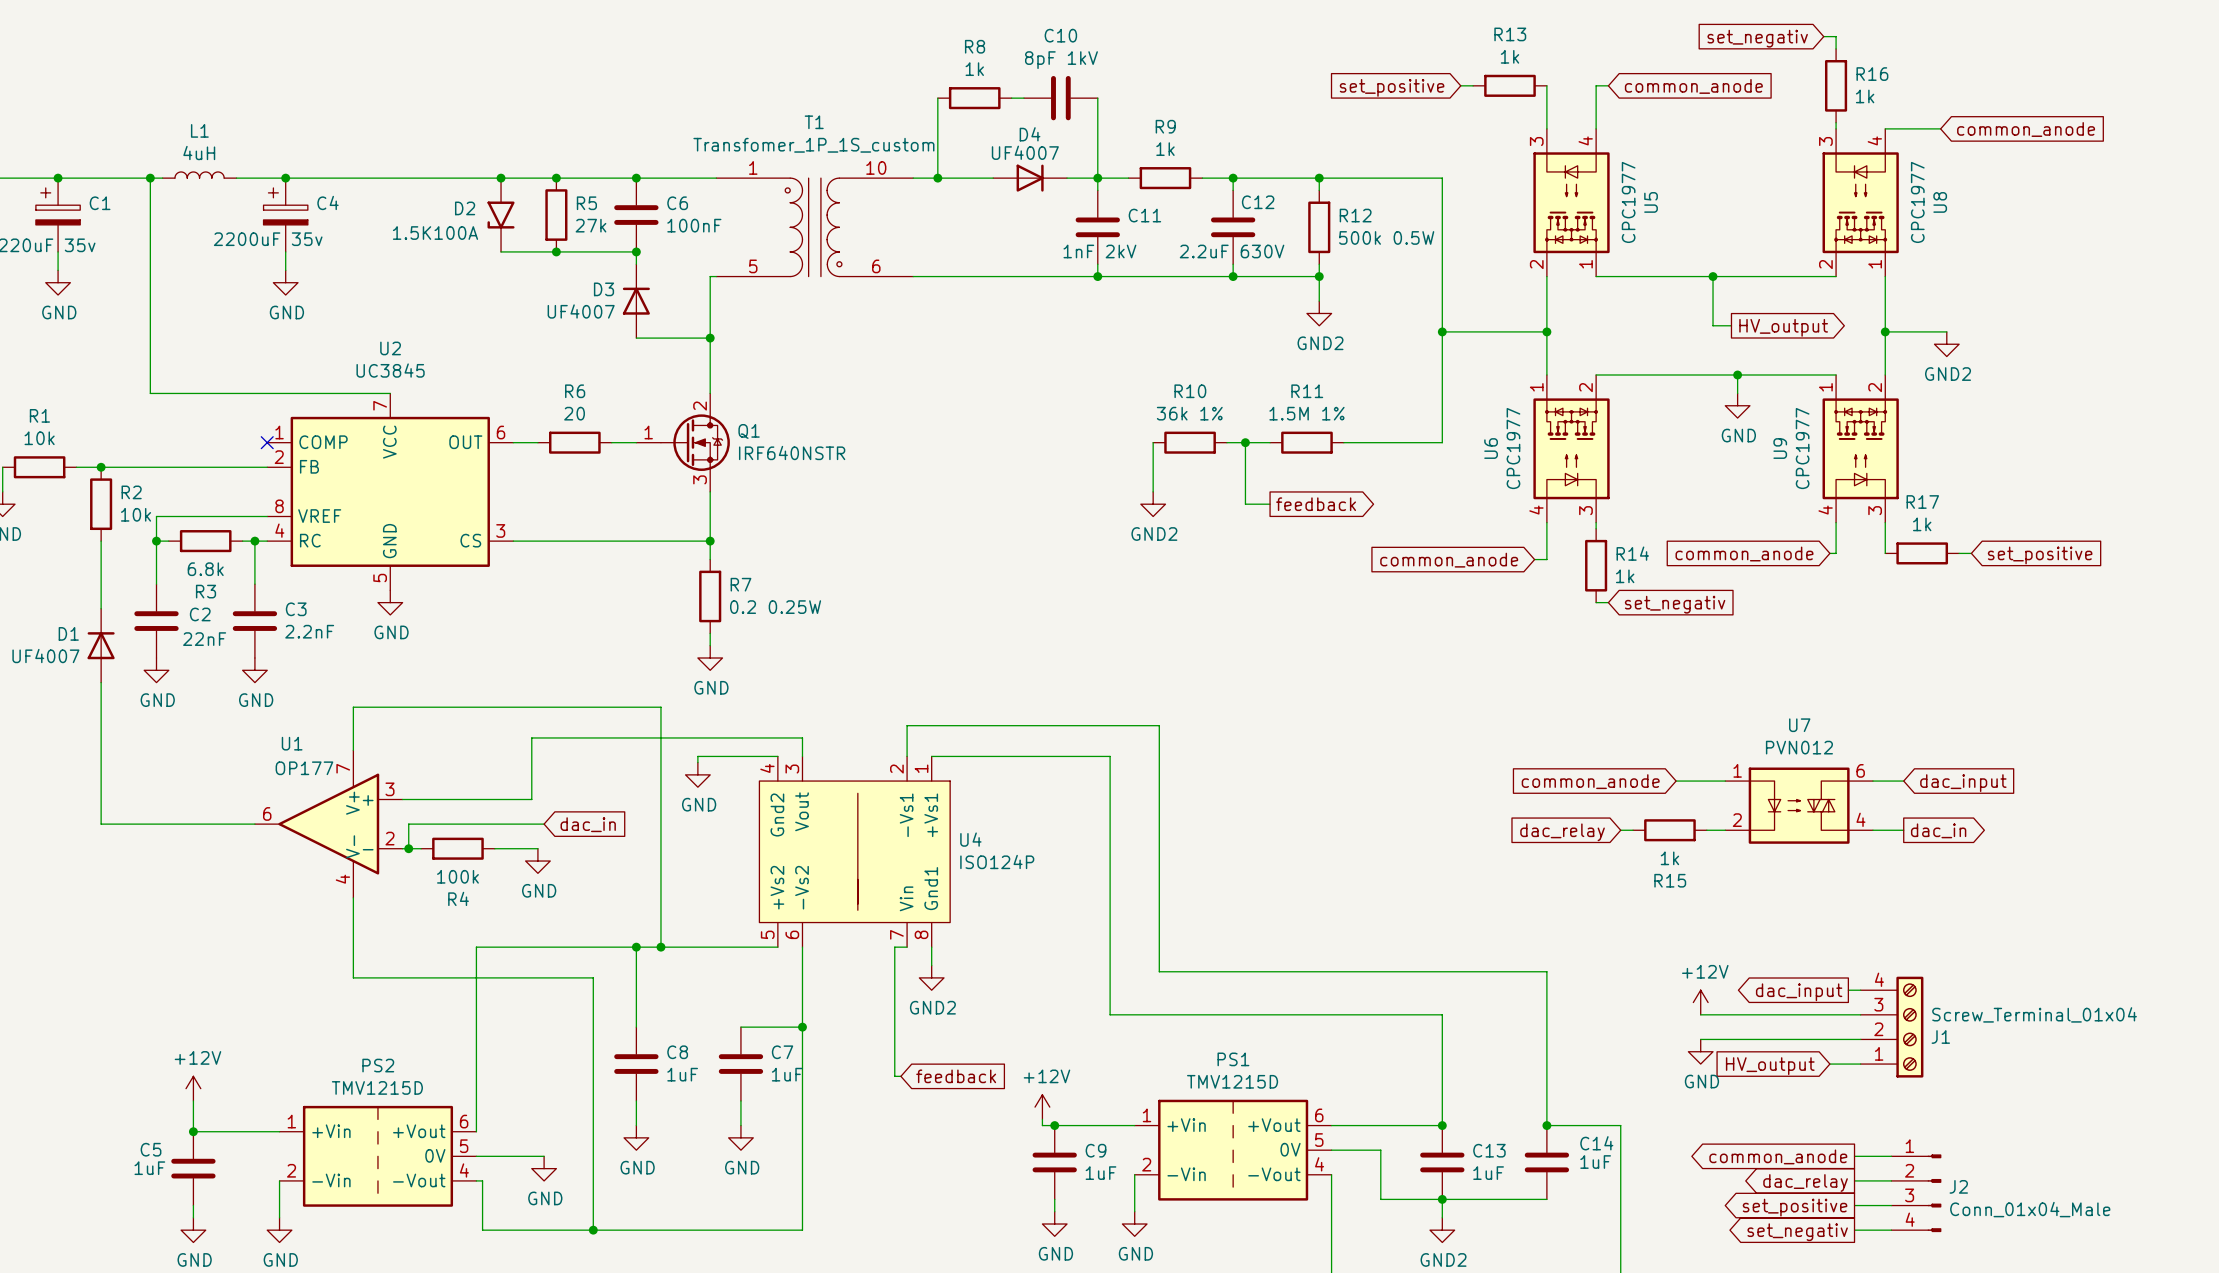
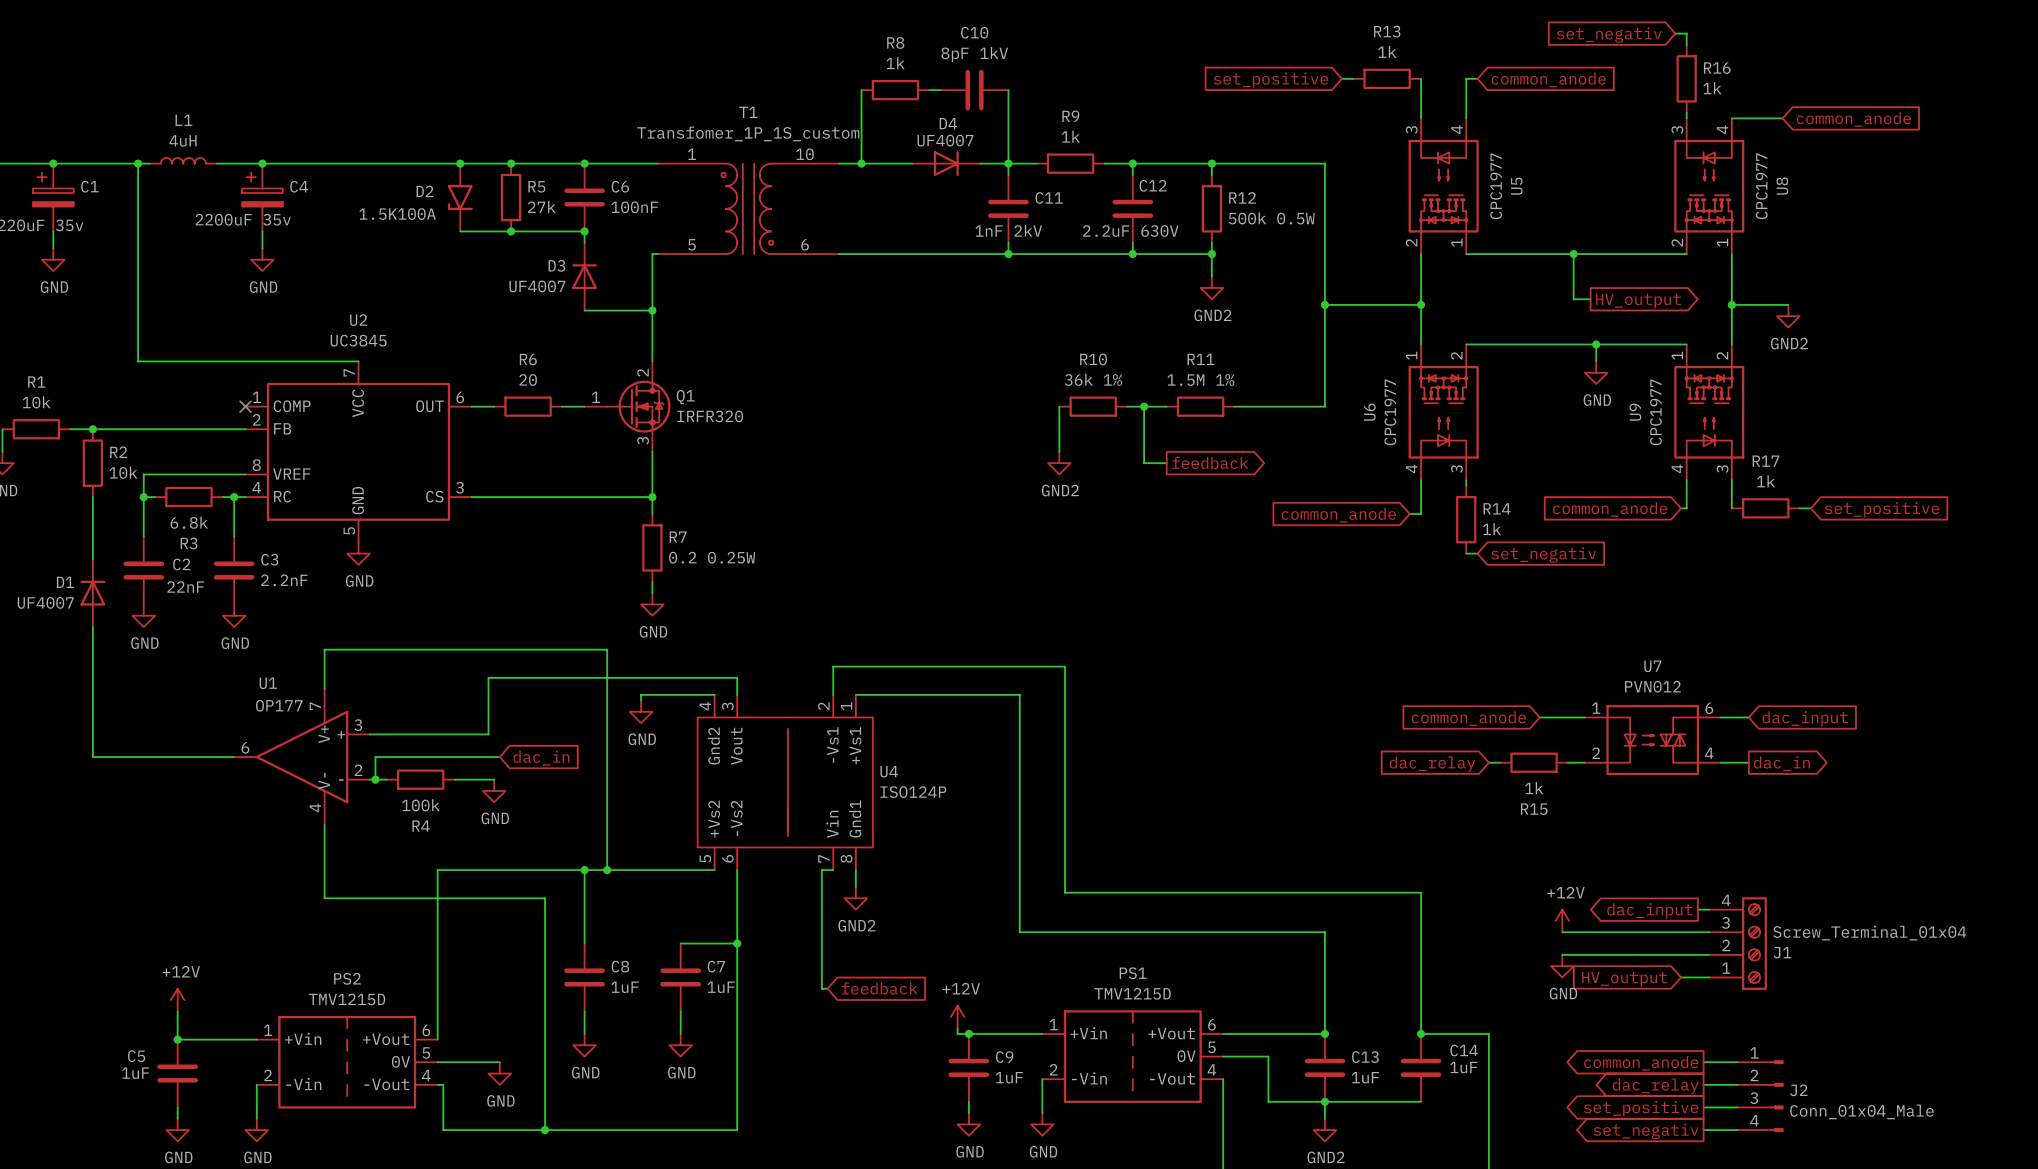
Q1 value: IRF640NSTR (792, 452) -> IRFR320 (710, 416)

